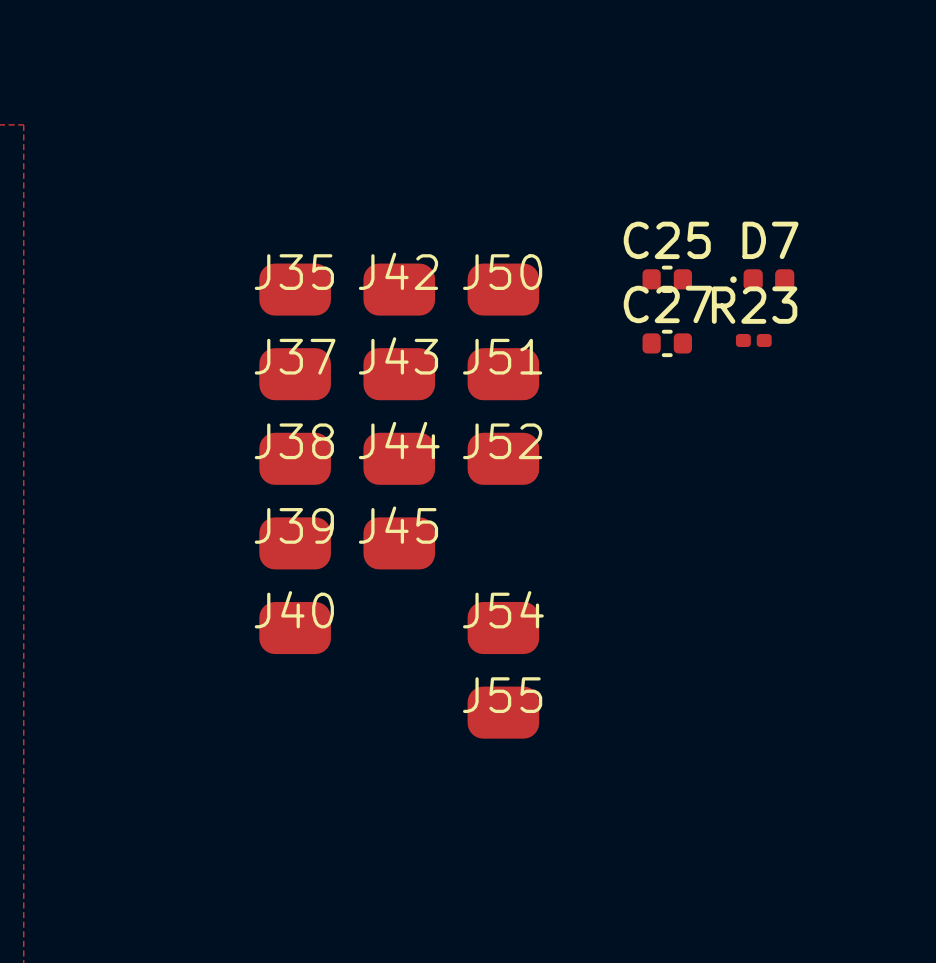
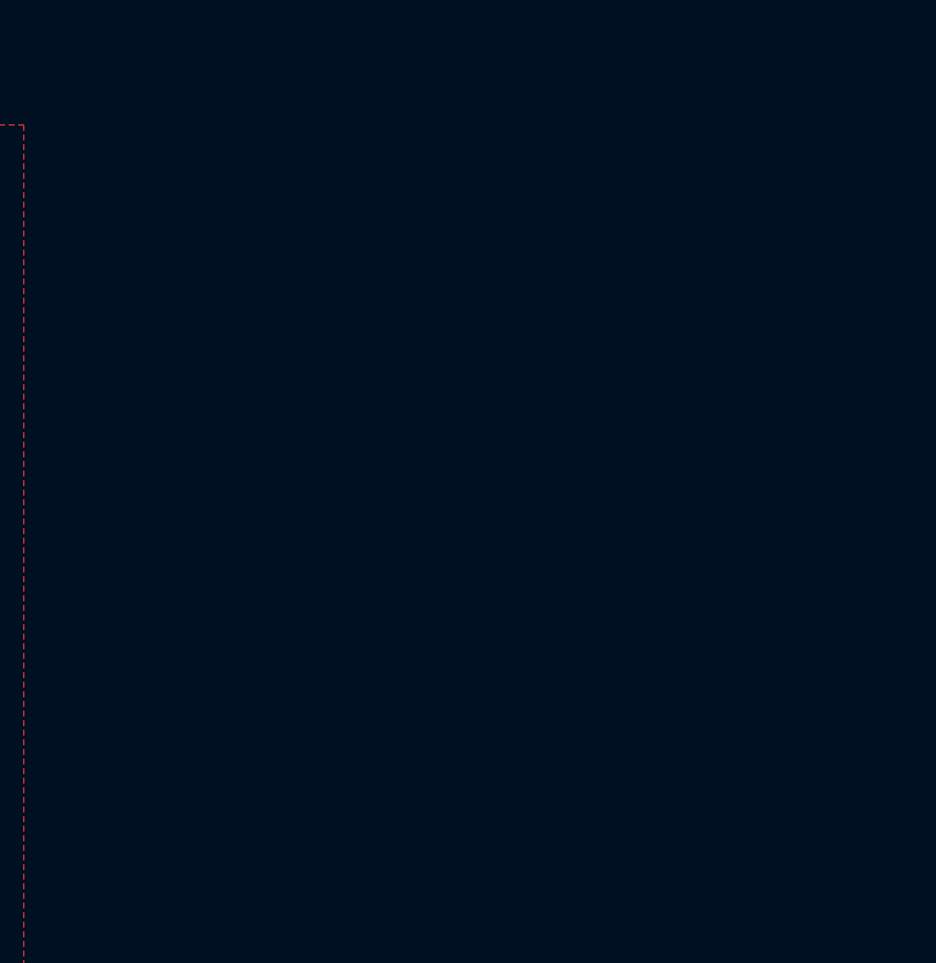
C25: (667, 279) -> none
D7: (762, 279) -> none
J35: (295, 289) -> none
J42: (399, 289) -> none
J50: (503, 289) -> none
R23: (753, 340) -> none
C27: (667, 343) -> none
J37: (295, 374) -> none
J43: (399, 374) -> none
J51: (503, 374) -> none
J38: (295, 458) -> none
J44: (399, 458) -> none
J52: (503, 458) -> none
J39: (295, 543) -> none
J45: (399, 543) -> none
J40: (295, 628) -> none
J54: (503, 628) -> none
J55: (503, 712) -> none

